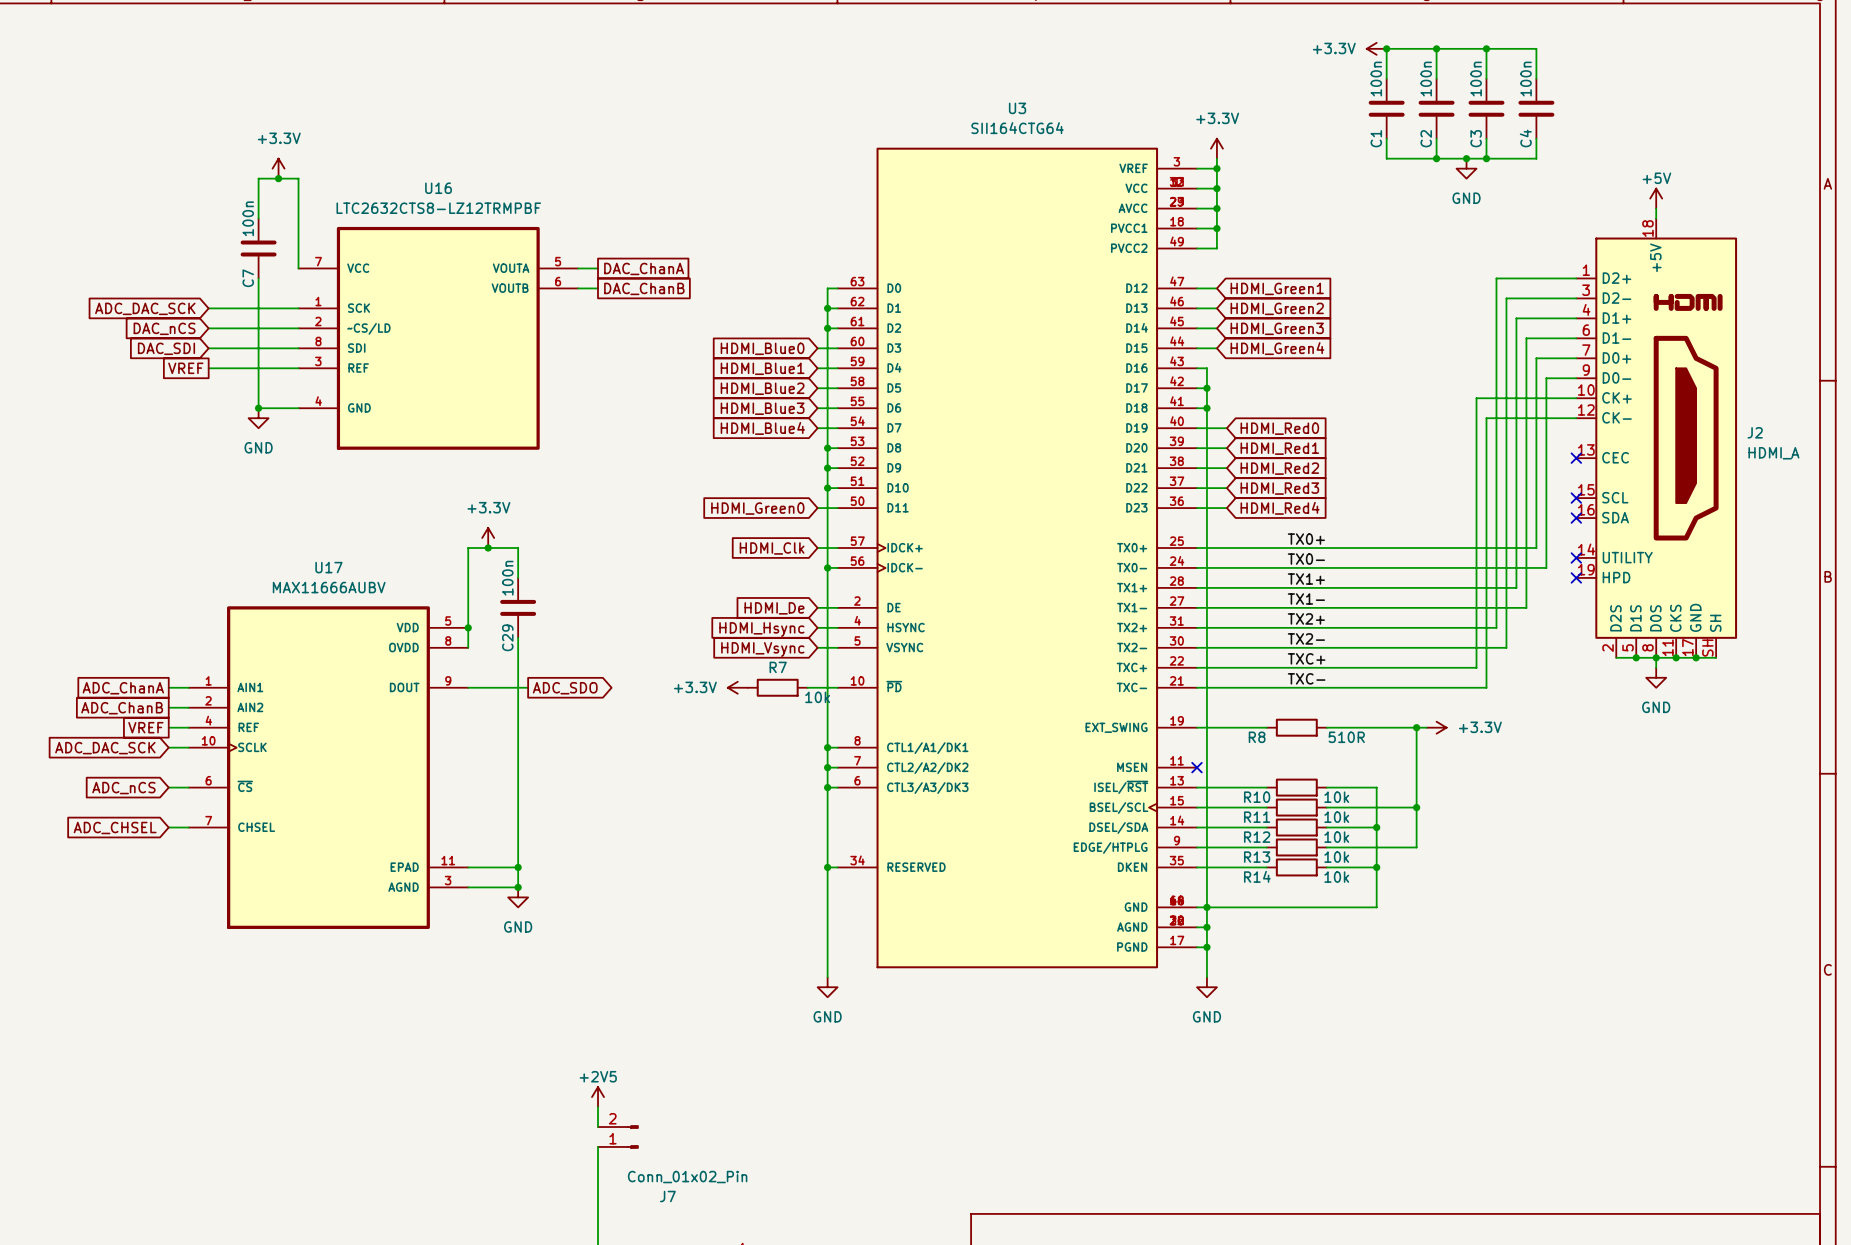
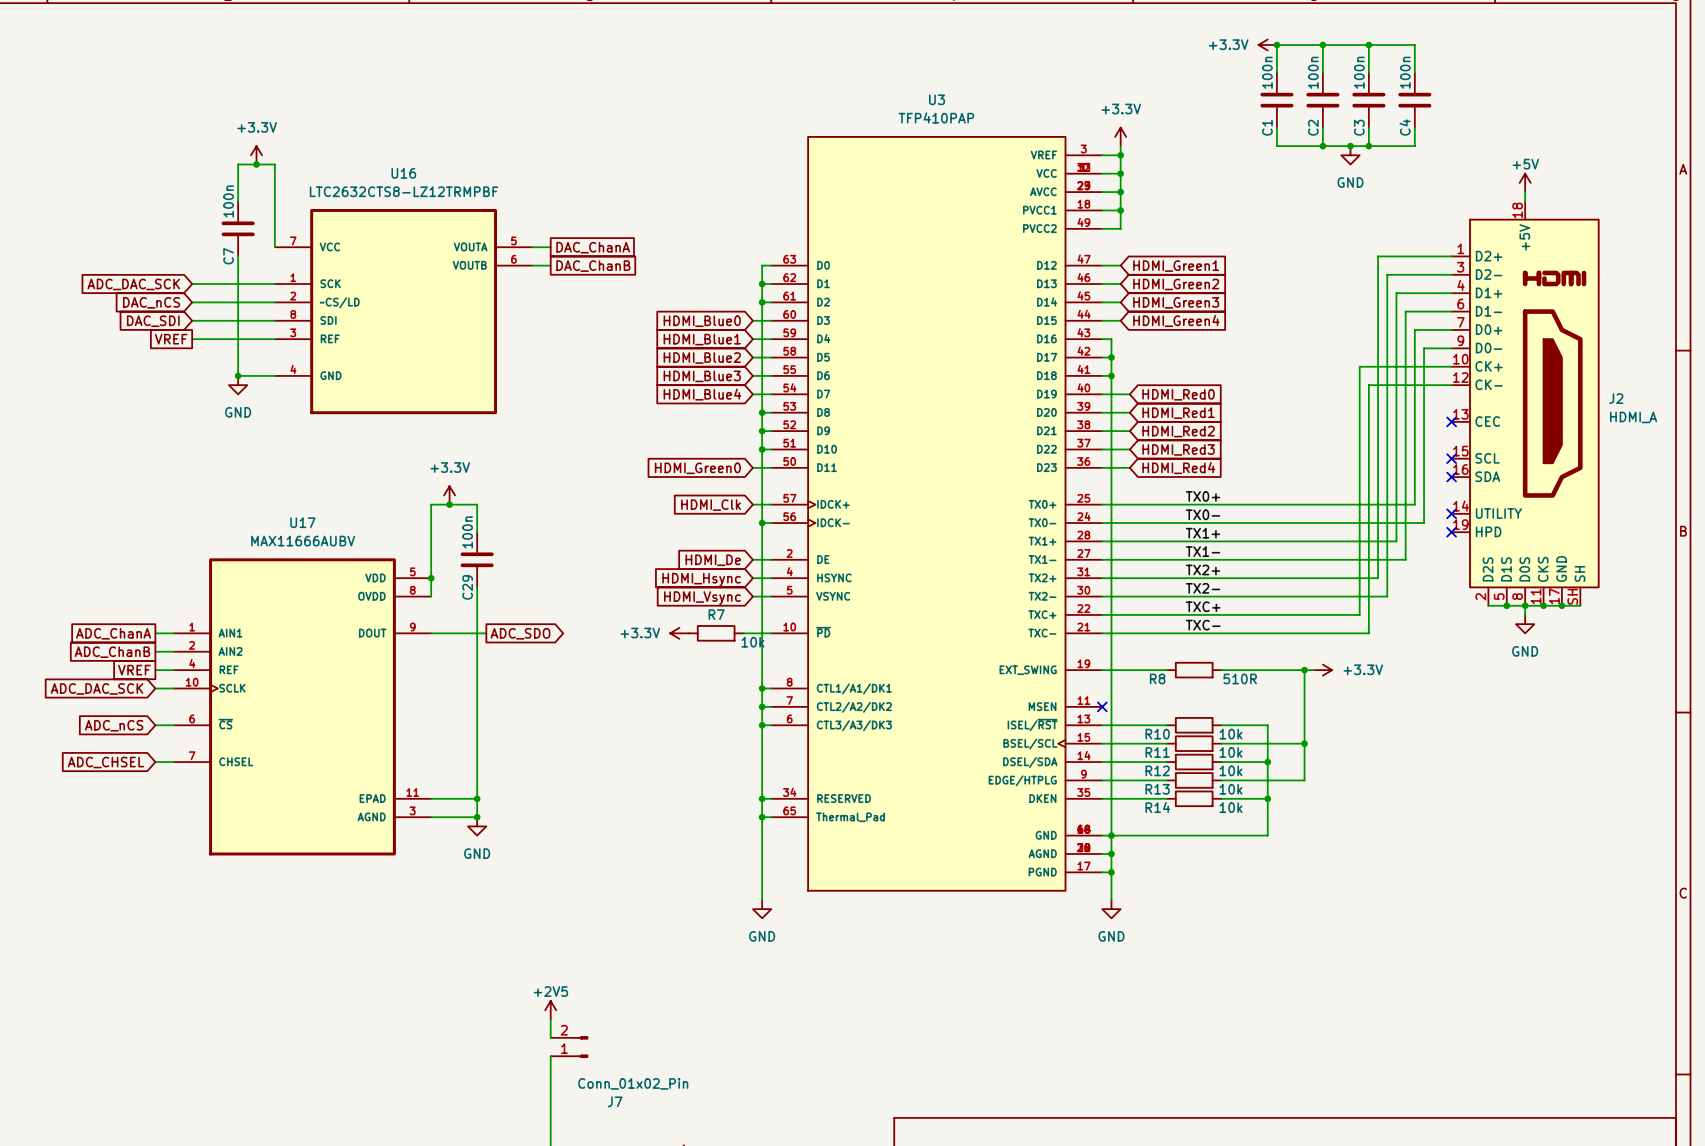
U3 value: SII164CTG64 (1017, 128) -> TFP410PAP (936, 117)
U3 symbol: [837, 147, 1197, 969] -> [771, 136, 1103, 892]
wire: none -> (762, 817) (771, 817)
junction: none -> (762, 817)

